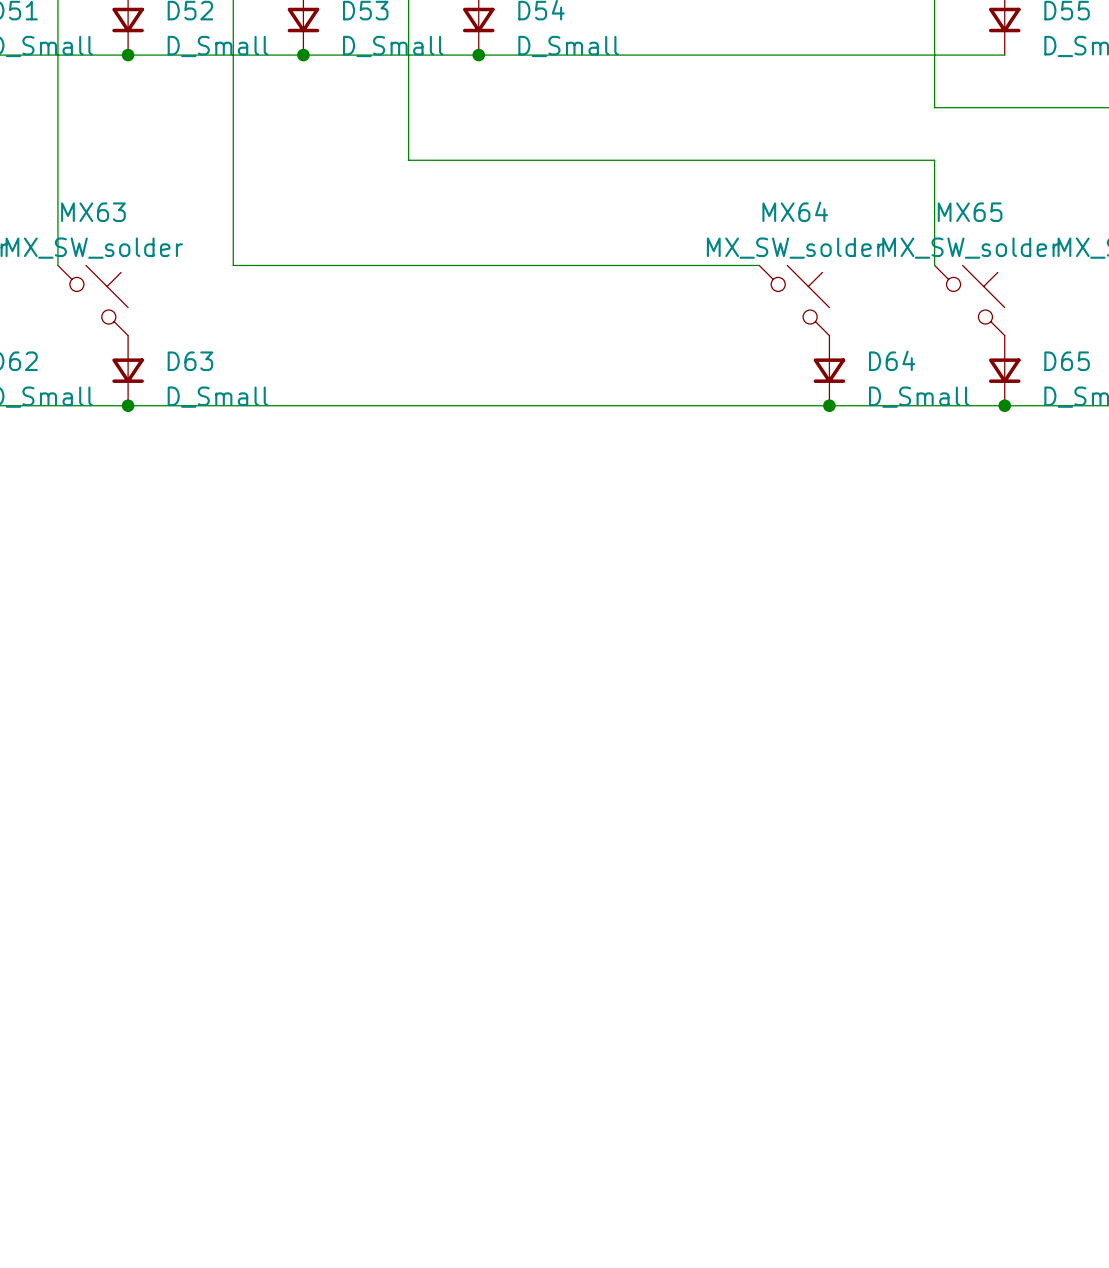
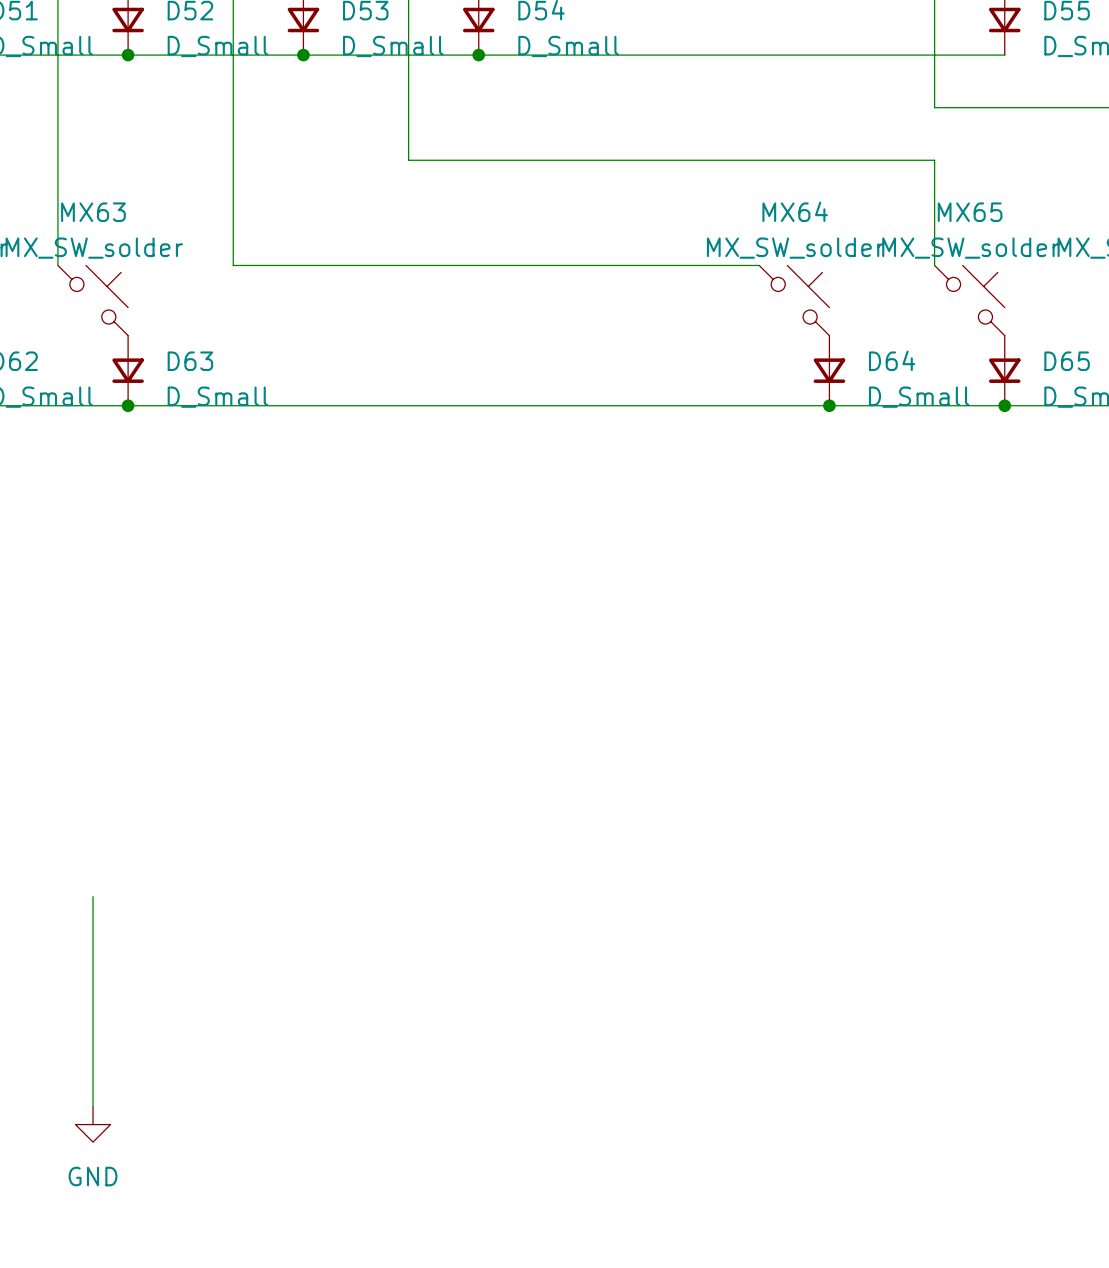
wire: none -> (93, 896) (93, 1107)
power symbol: none -> GND (93, 1124)

